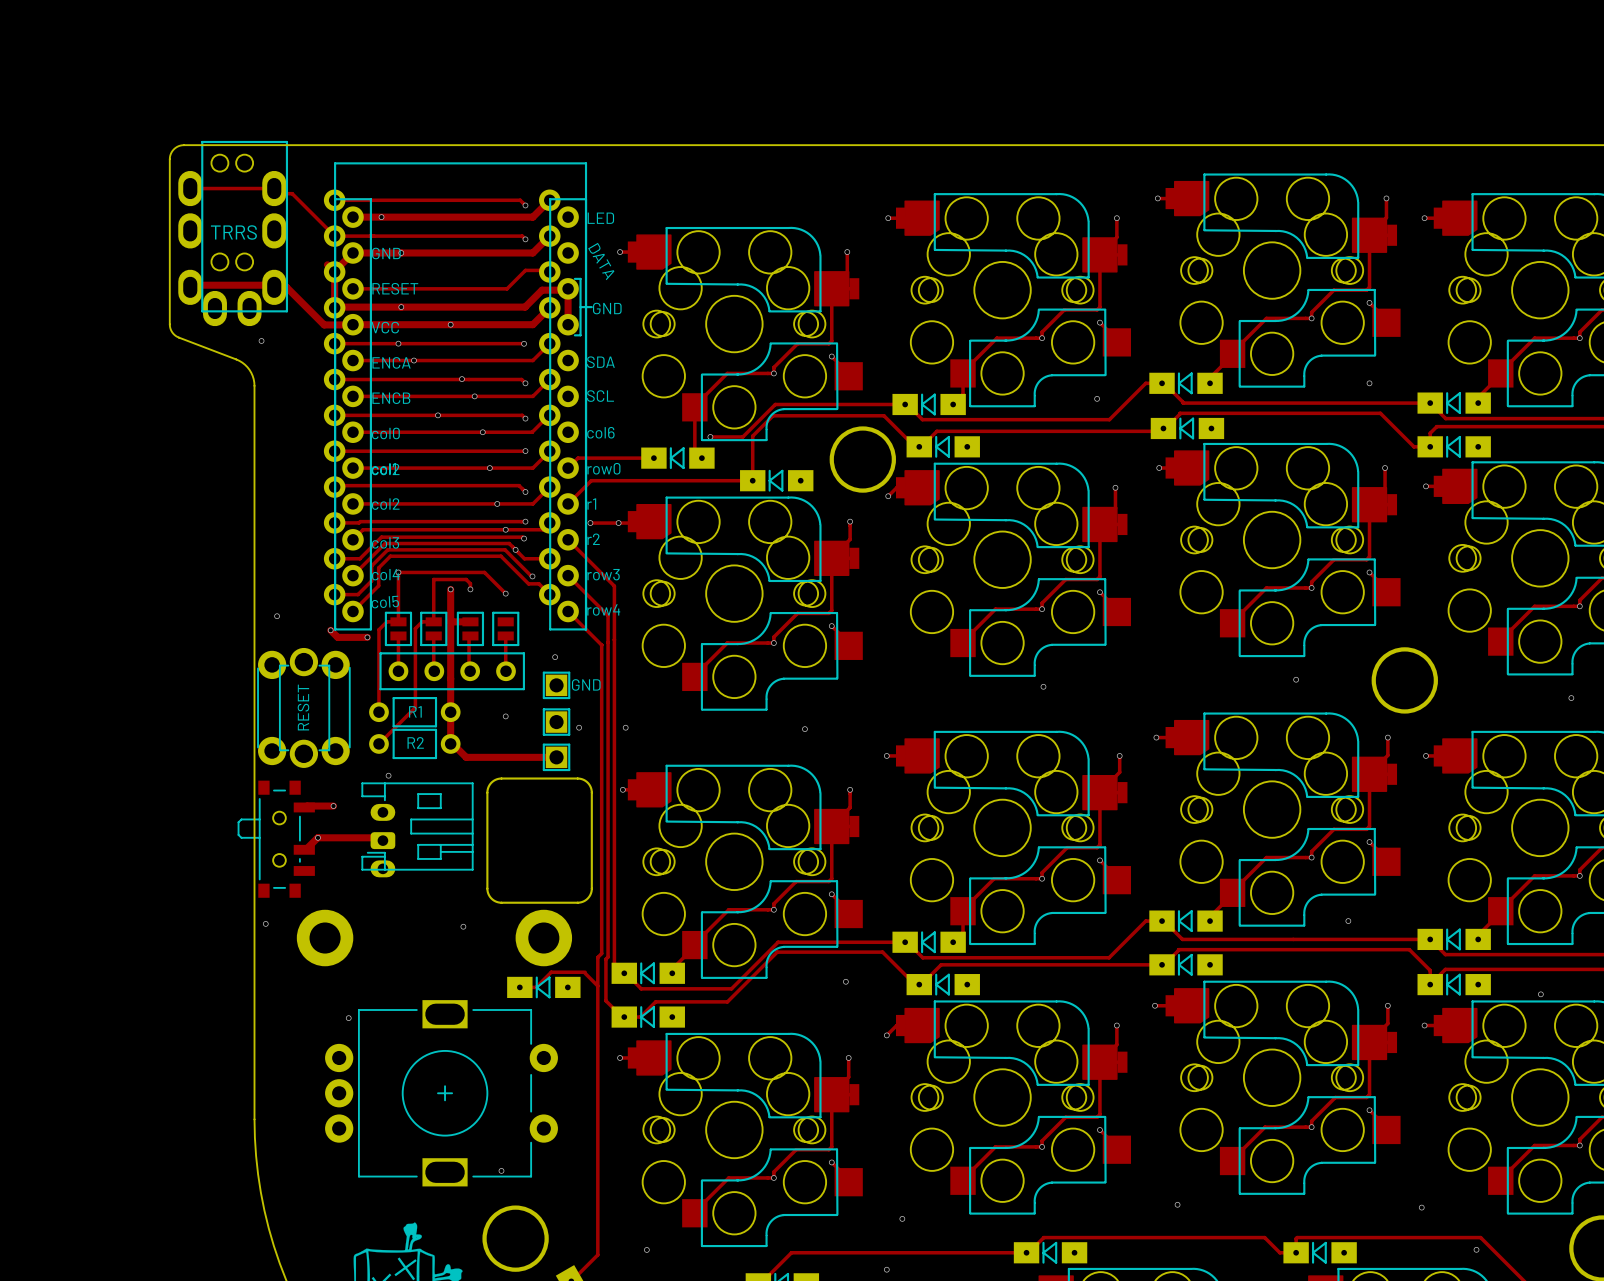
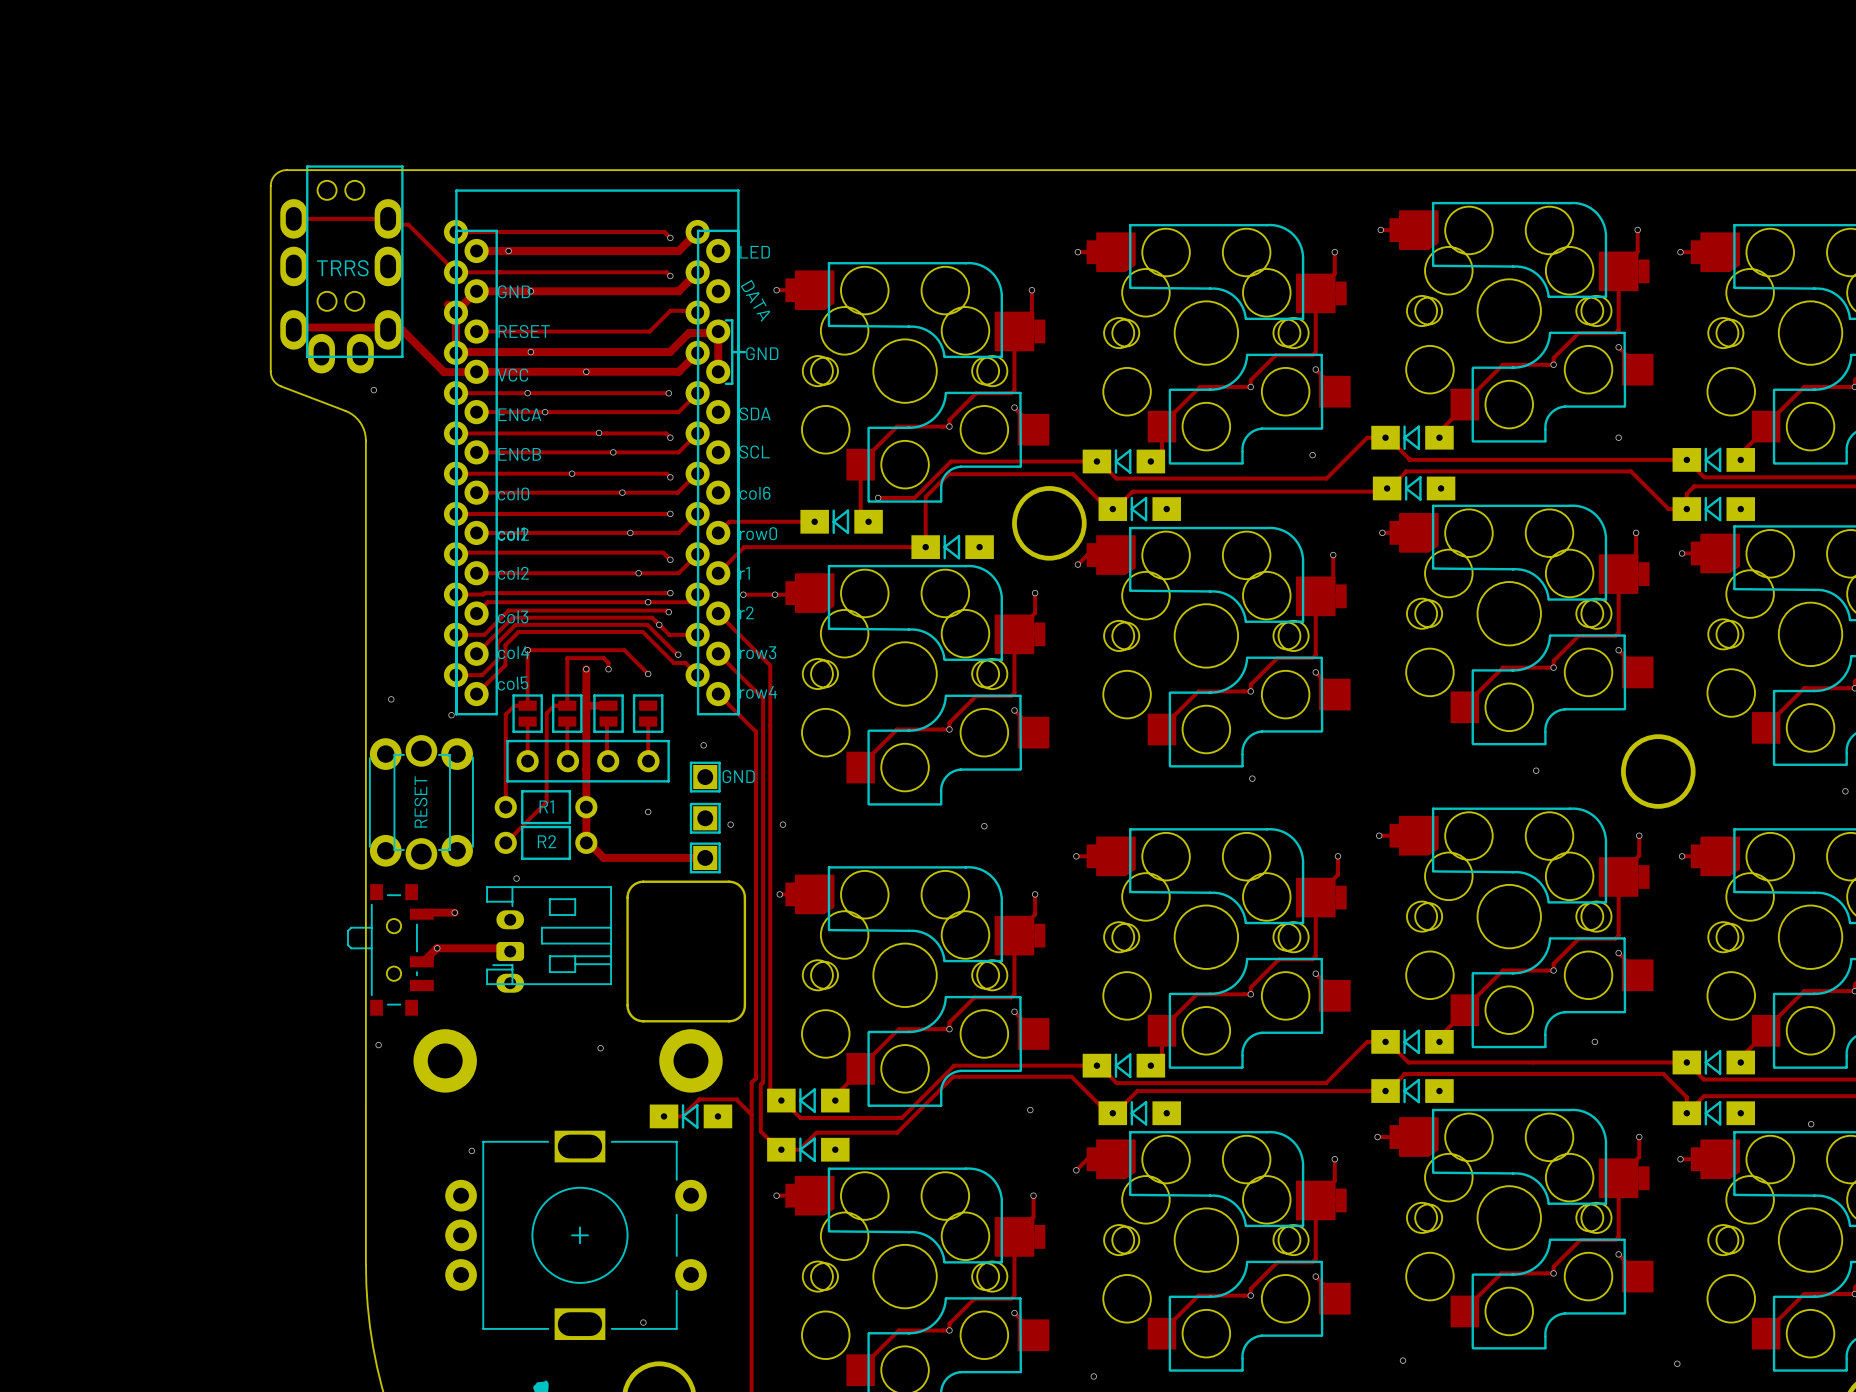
track: (330, 630) (337, 637) (367, 637) -> none
via: (367, 637) -> none

